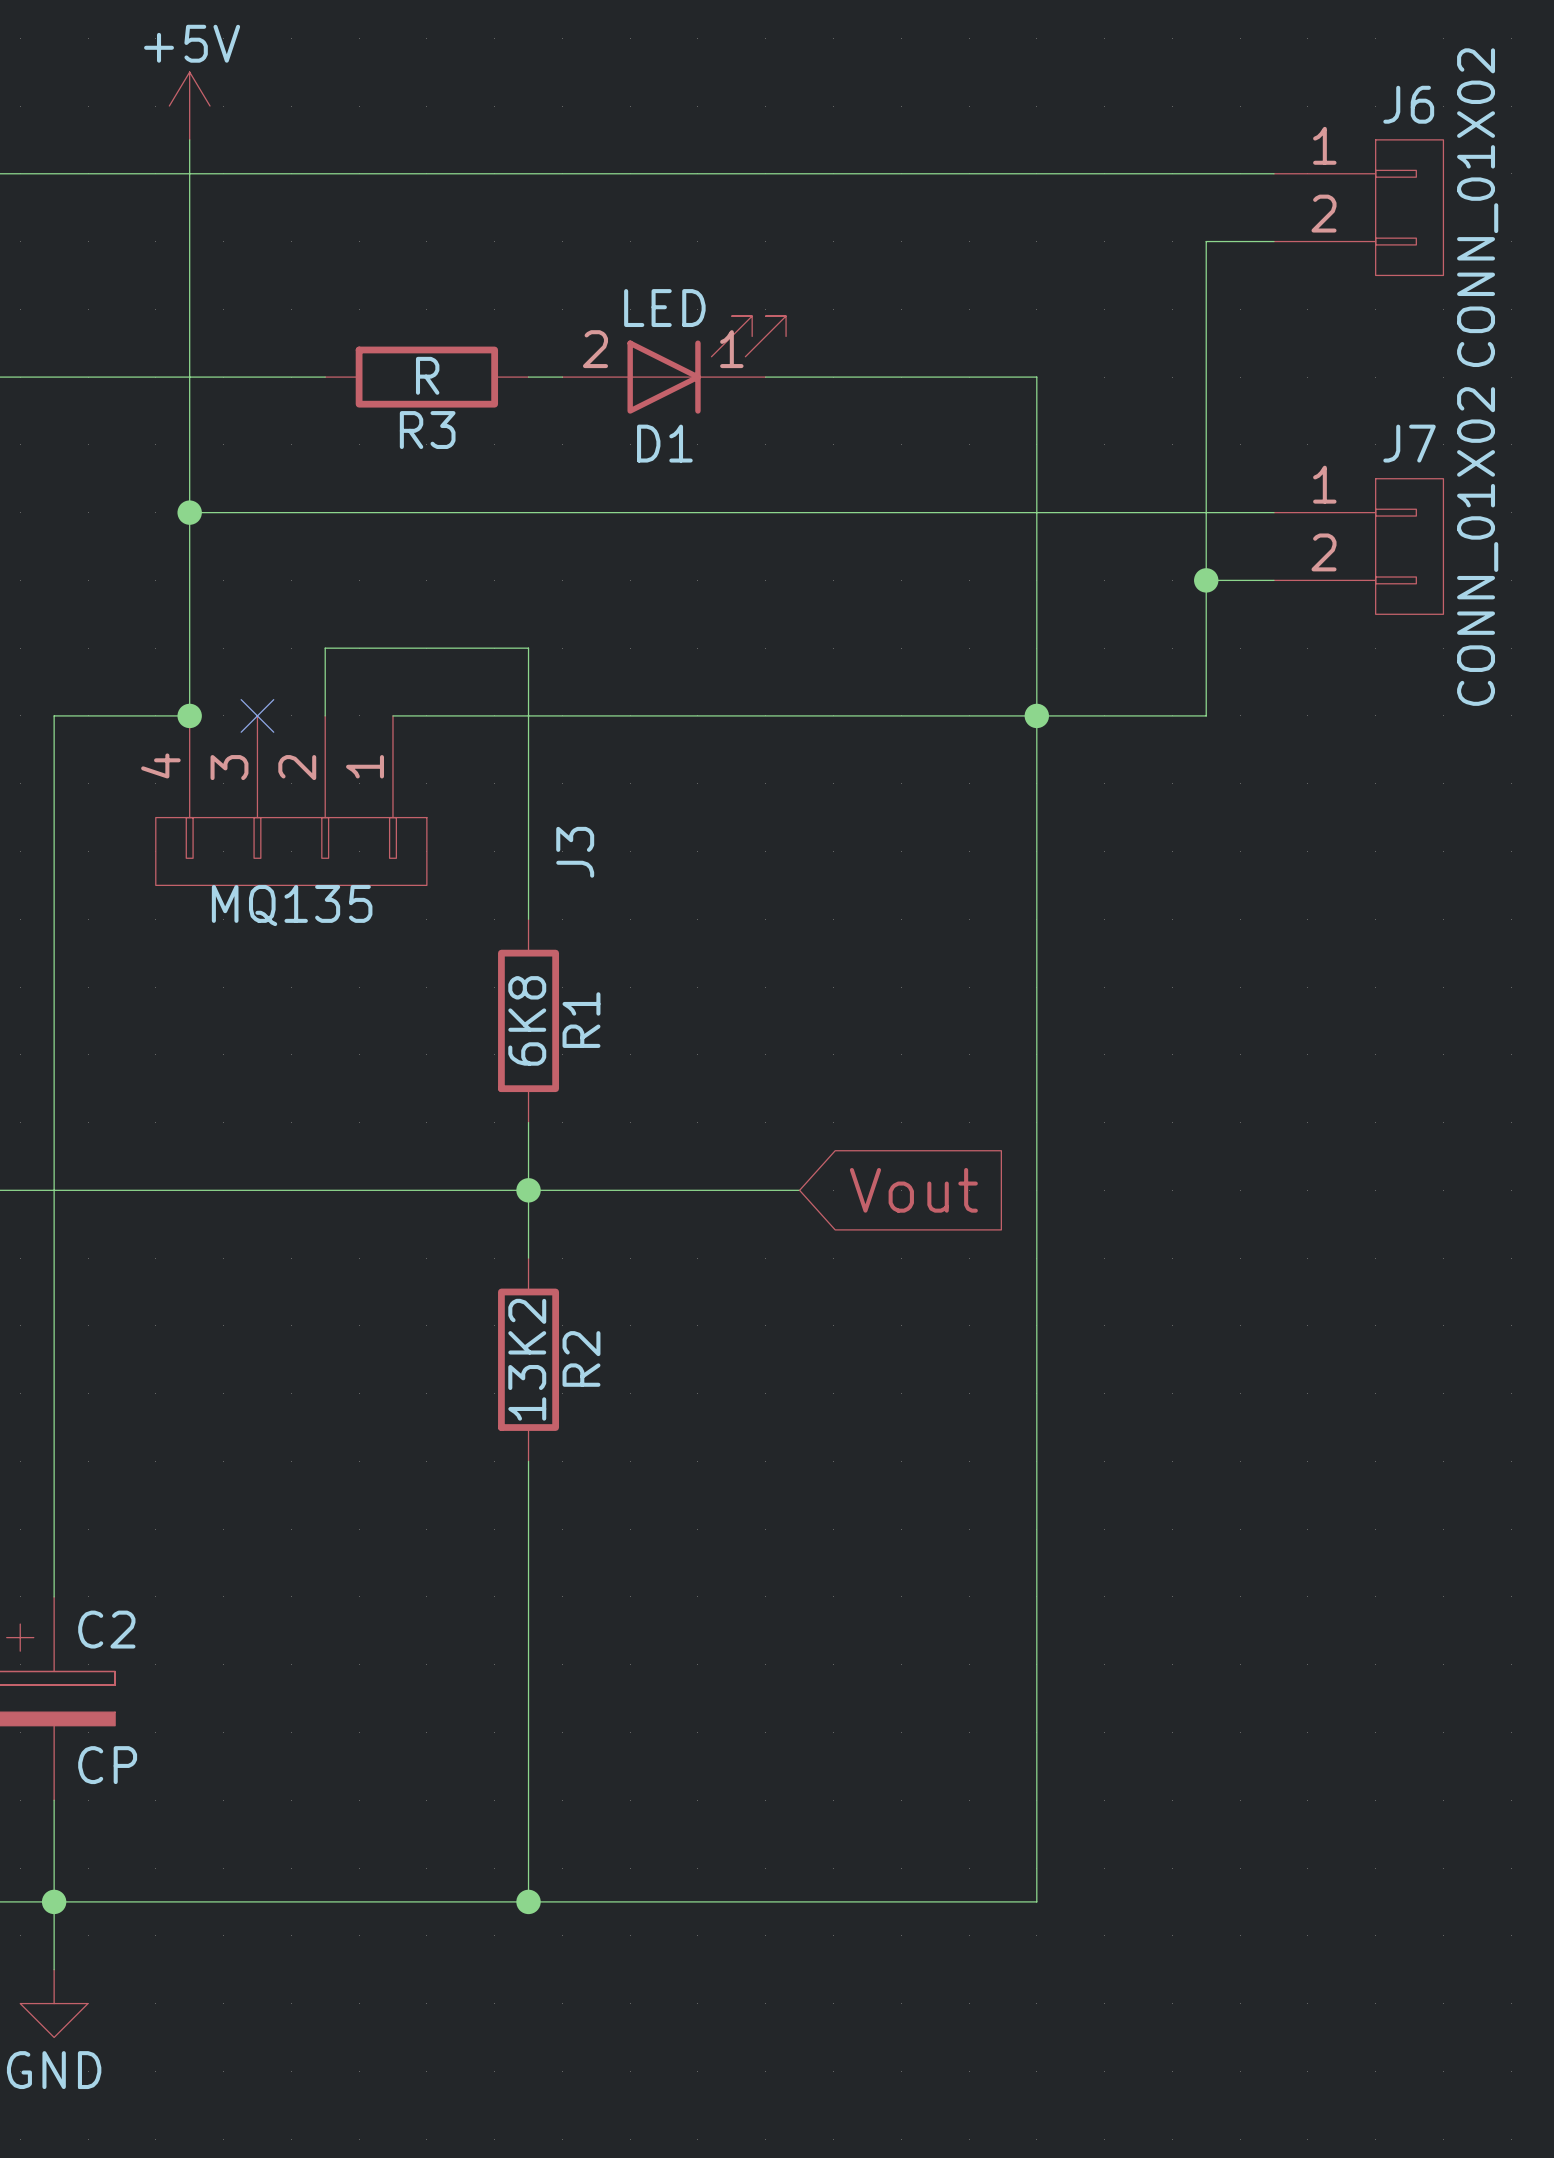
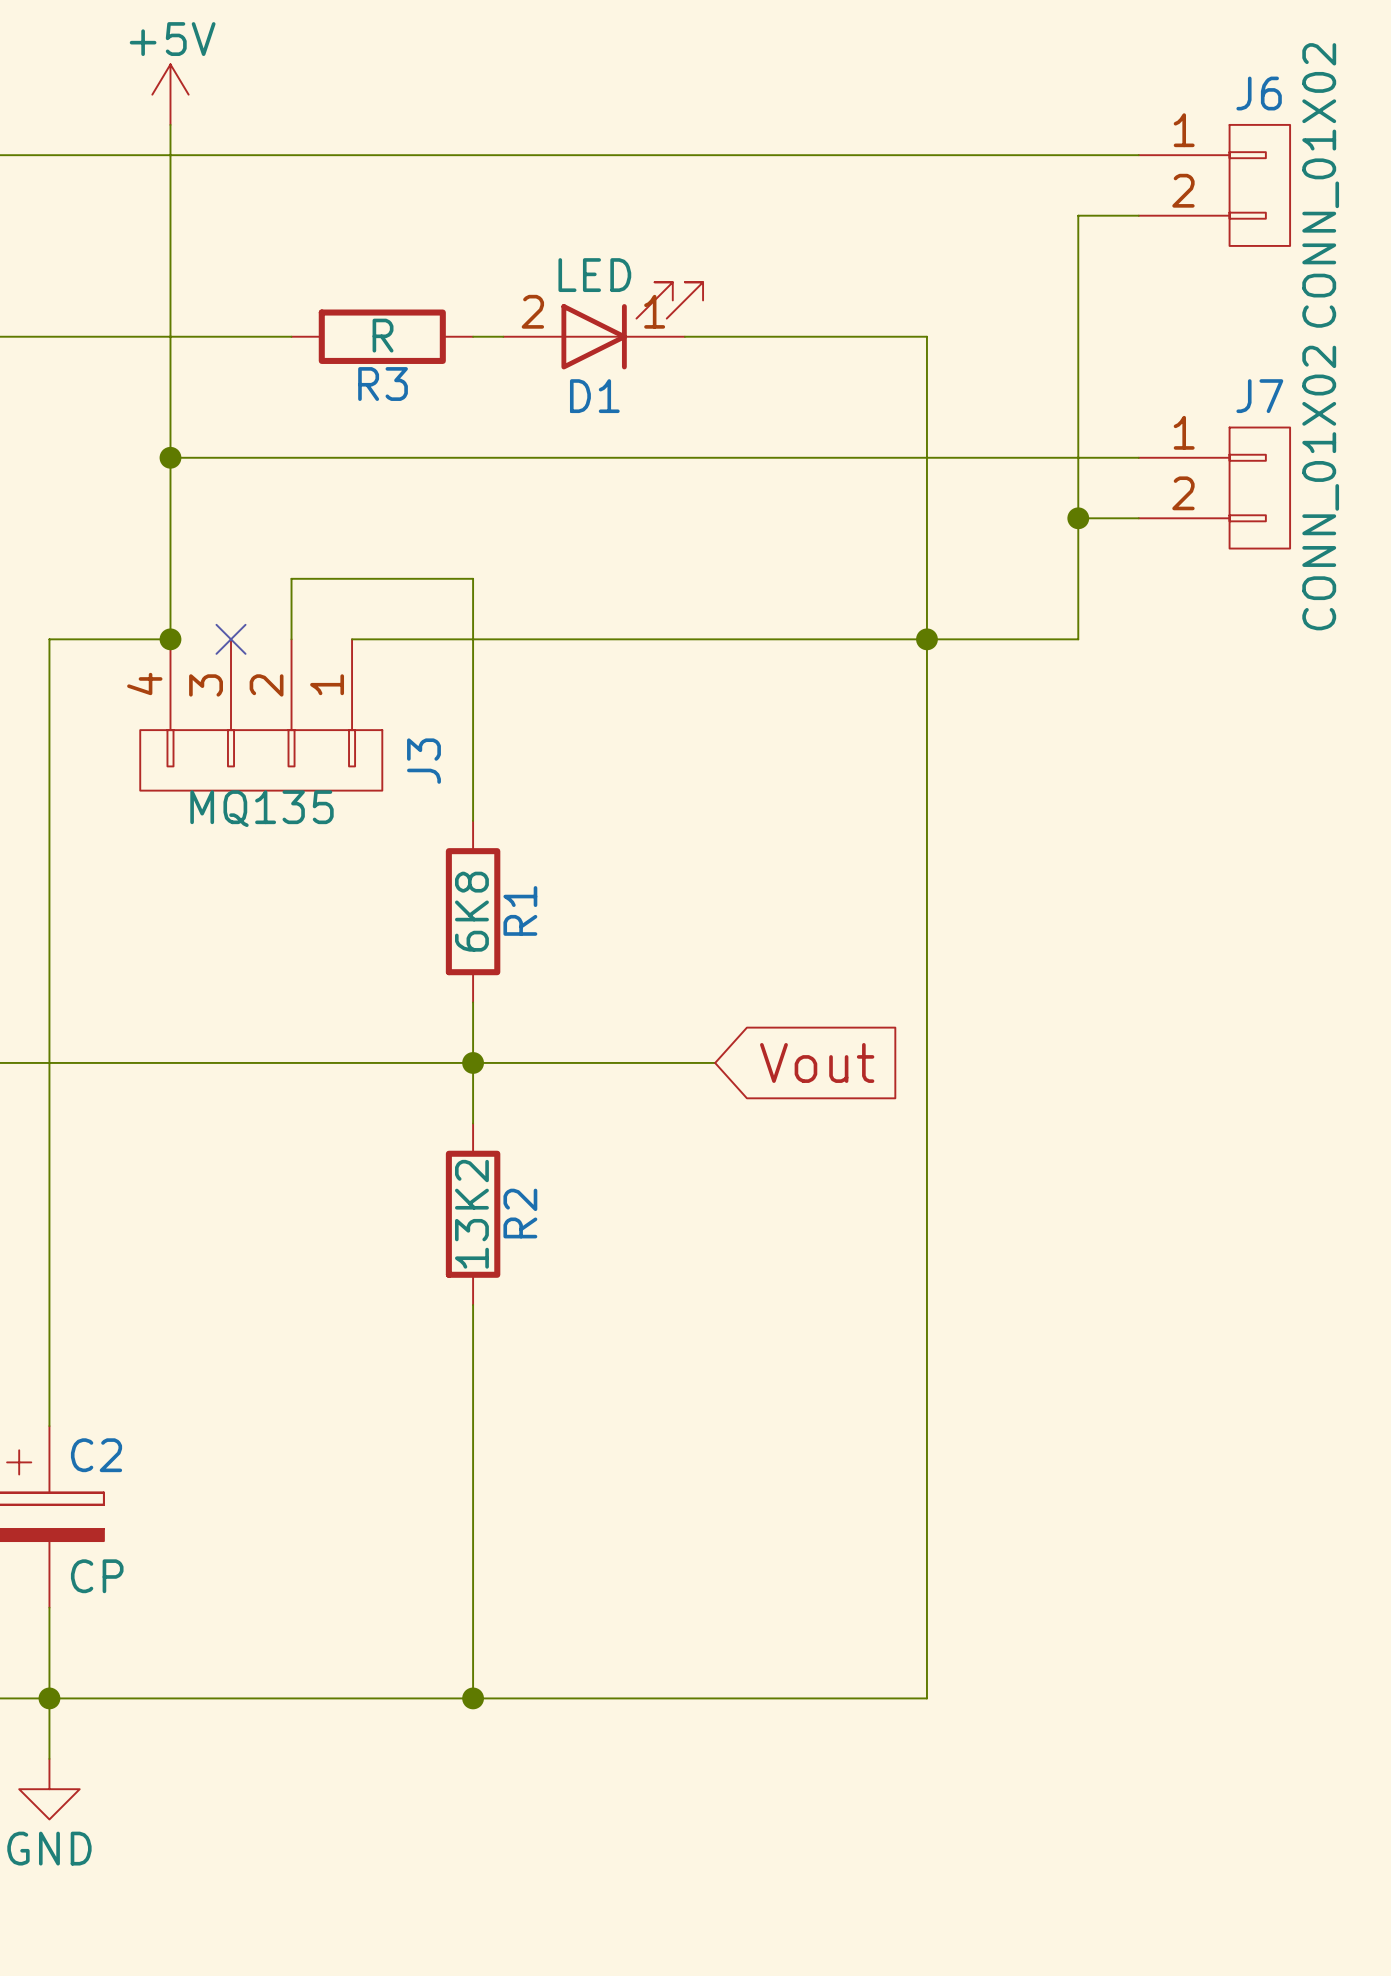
J3 name position: J3 (575, 852) -> J3 (423, 761)

